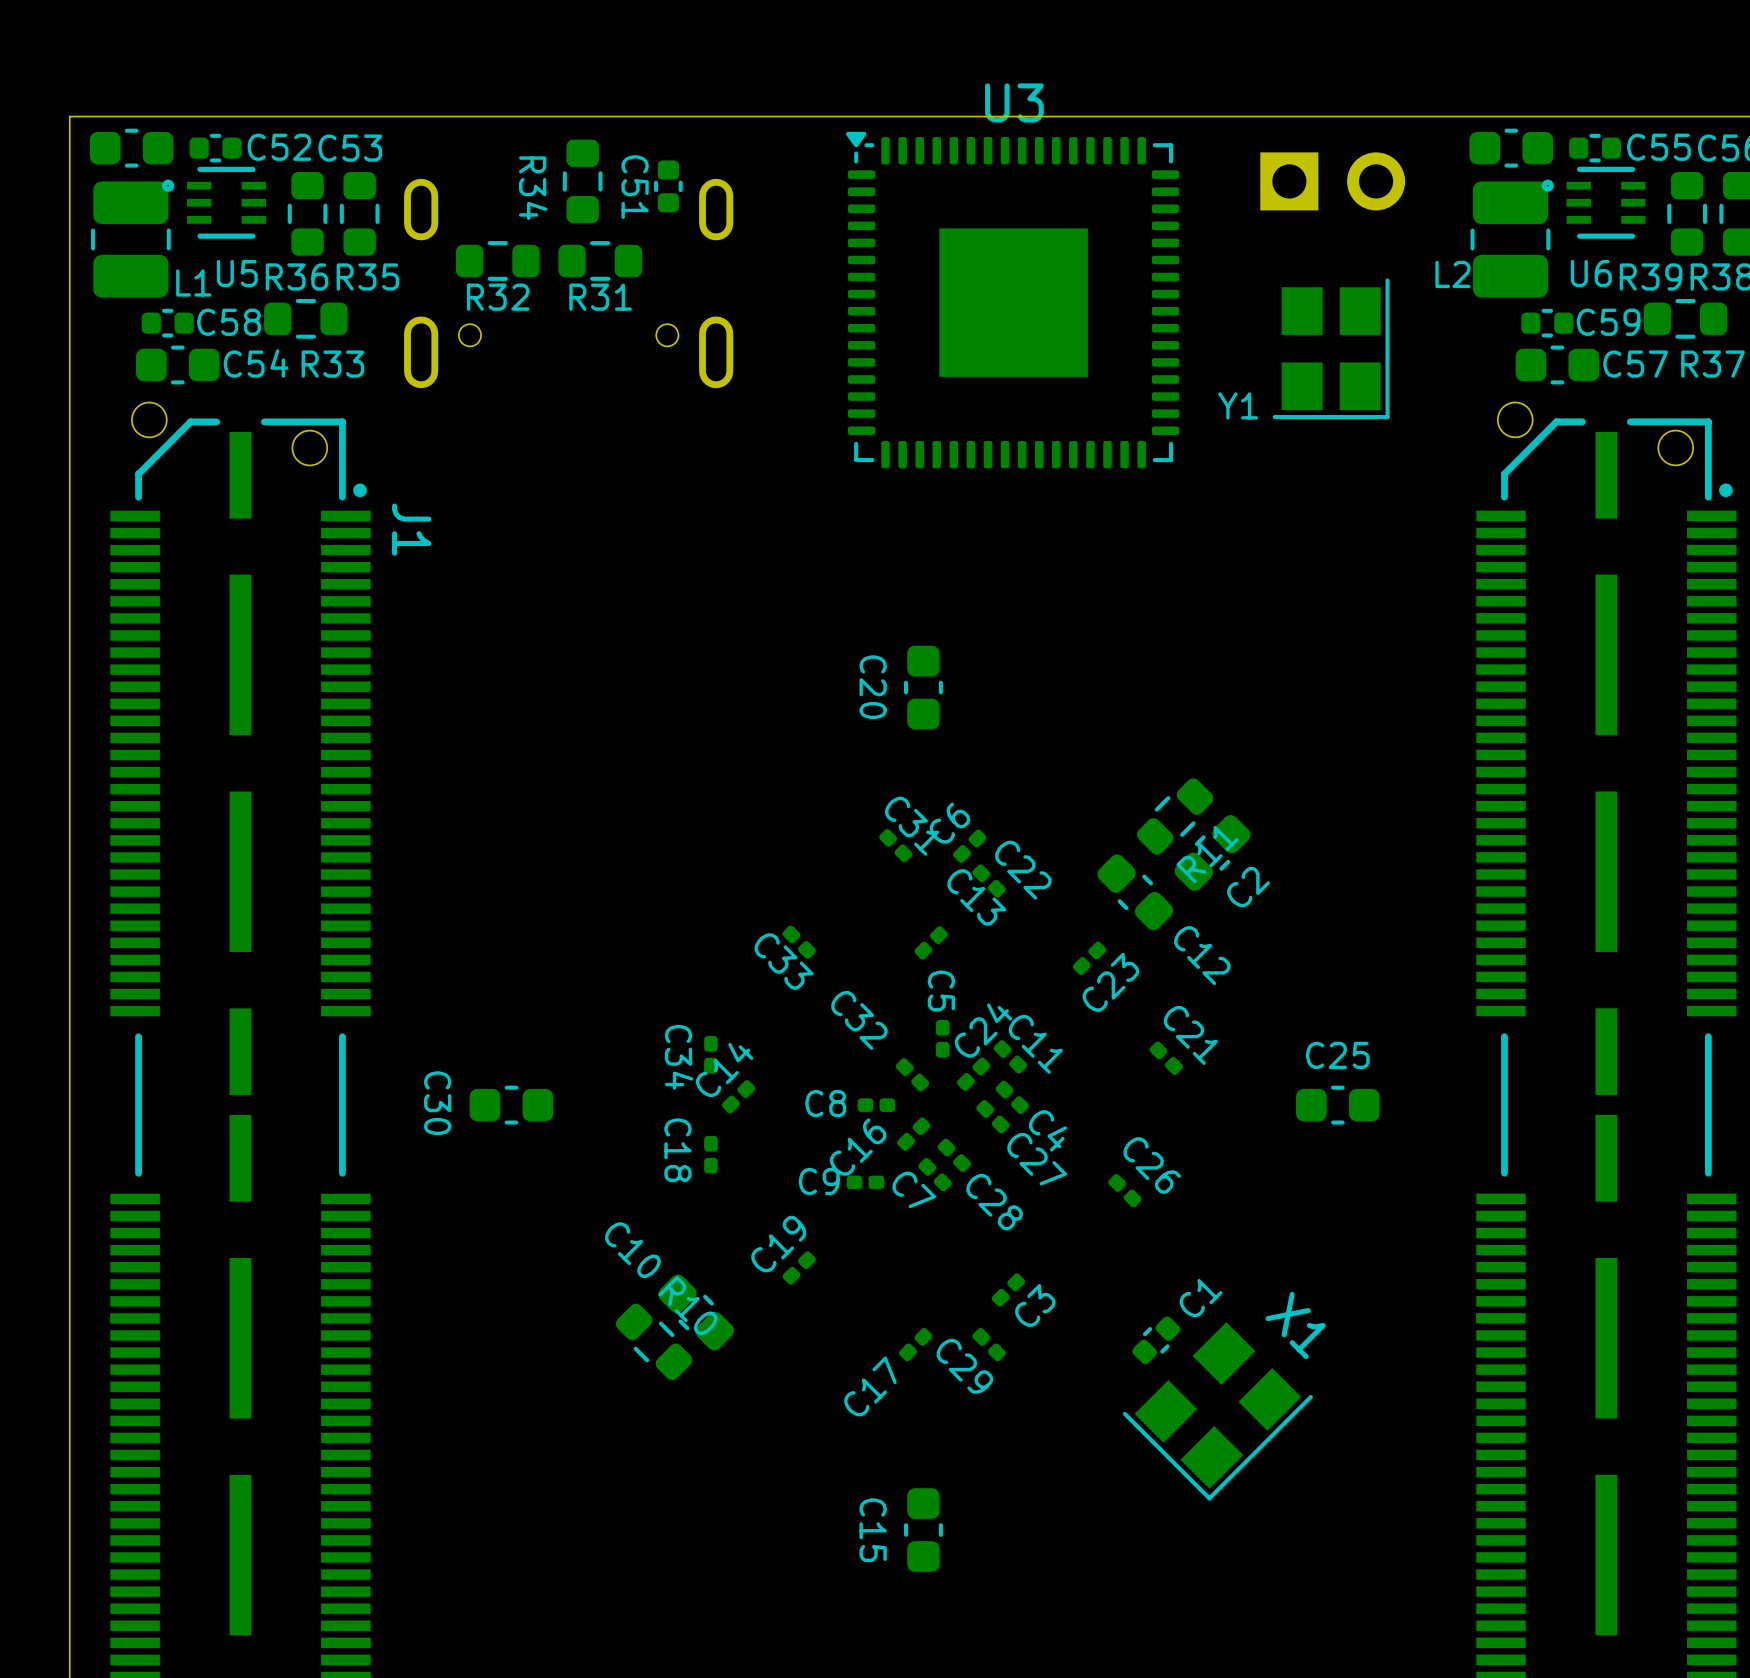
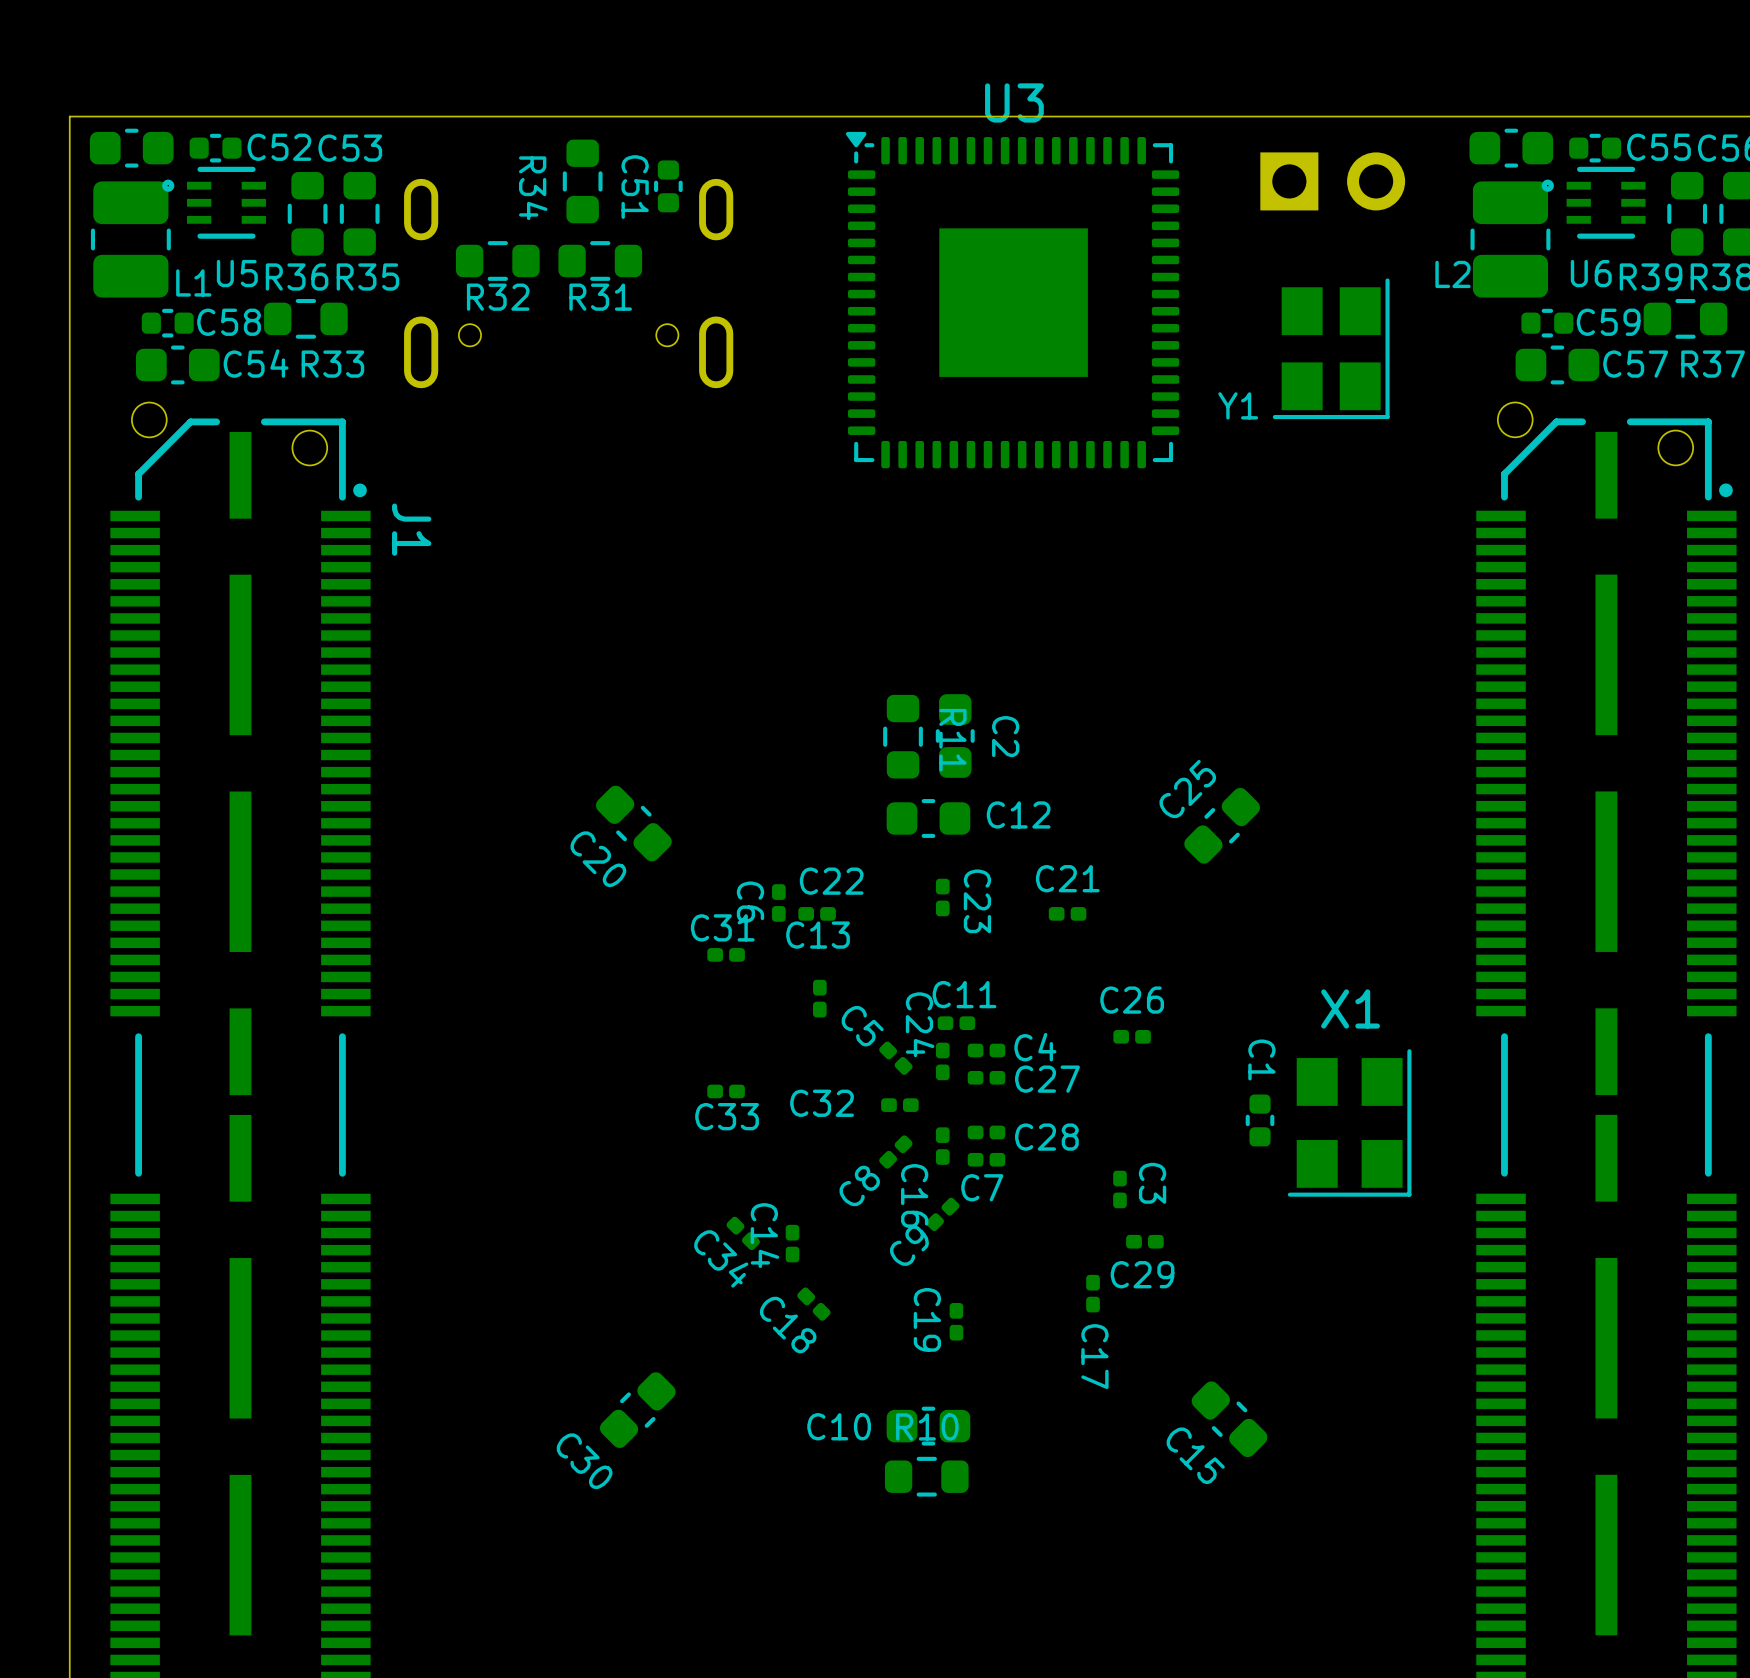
C20 rotation: 0° (923, 687) -> 45° counterclockwise (633, 823)
C20 position: (923, 687) -> (633, 823)
R11 rotation: 0° (1175, 816) -> 45° counterclockwise (903, 736)
R11 position: (1175, 816) -> (903, 736)
C31 rotation: 0° (895, 845) -> 45° counterclockwise (726, 954)
C31 position: (895, 845) -> (726, 954)
C6 rotation: 0° (969, 846) -> 45° counterclockwise (778, 902)
C6 position: (969, 846) -> (778, 902)
C2 rotation: 0° (1212, 852) -> 45° counterclockwise (955, 736)
C2 position: (1212, 852) -> (955, 736)
C22 rotation: 0° (989, 881) -> 45° counterclockwise (817, 913)
C22 position: (989, 881) -> (817, 913)
C12 rotation: 0° (1135, 892) -> 45° counterclockwise (928, 818)
C12 position: (1135, 892) -> (928, 818)
C33 rotation: 0° (799, 942) -> 45° counterclockwise (726, 1091)
C33 position: (799, 942) -> (726, 1091)
C13 rotation: 0° (931, 942) -> 45° counterclockwise (819, 998)
C13 position: (931, 942) -> (819, 998)
C23 rotation: 0° (1089, 958) -> 45° counterclockwise (942, 897)
C23 position: (1089, 958) -> (942, 897)
C5 rotation: 0° (942, 1038) -> 45° counterclockwise (895, 1058)
C5 position: (942, 1038) -> (895, 1058)
C34 rotation: 0° (710, 1054) -> 45° counterclockwise (743, 1233)
C34 position: (710, 1054) -> (743, 1233)
C11 rotation: 0° (1010, 1056) -> 45° counterclockwise (956, 1023)
C11 position: (1010, 1056) -> (956, 1023)
C21 rotation: 0° (1166, 1058) -> 45° counterclockwise (1067, 913)
C21 position: (1166, 1058) -> (1067, 913)
C32 rotation: 0° (912, 1074) -> 45° counterclockwise (899, 1105)
C32 position: (912, 1074) -> (899, 1105)
C24 rotation: 0° (973, 1074) -> 45° counterclockwise (942, 1061)
C24 position: (973, 1074) -> (942, 1061)
C14 rotation: 0° (738, 1096) -> 45° counterclockwise (792, 1243)
C14 position: (738, 1096) -> (792, 1243)
C4 rotation: 0° (1012, 1097) -> 45° counterclockwise (986, 1050)
C4 position: (1012, 1097) -> (986, 1050)
C30 rotation: 0° (511, 1105) -> 45° counterclockwise (637, 1410)
C30 position: (511, 1105) -> (637, 1410)
C8 rotation: 0° (876, 1105) -> 45° counterclockwise (895, 1152)
C8 position: (876, 1105) -> (895, 1152)
C25 rotation: 0° (1337, 1105) -> 45° counterclockwise (1222, 825)
C25 position: (1337, 1105) -> (1222, 825)
C27 rotation: 0° (992, 1116) -> 45° counterclockwise (986, 1077)
C27 position: (992, 1116) -> (986, 1077)
C16 rotation: 0° (913, 1134) -> 45° counterclockwise (942, 1146)
C16 position: (913, 1134) -> (942, 1146)
C18 rotation: 0° (710, 1154) -> 45° counterclockwise (813, 1304)
C18 position: (710, 1154) -> (813, 1304)
C28 rotation: 0° (954, 1155) -> 45° counterclockwise (986, 1132)
C28 position: (954, 1155) -> (986, 1132)
C7 rotation: 0° (935, 1174) -> 45° counterclockwise (986, 1159)
C7 position: (935, 1174) -> (986, 1159)
C9 rotation: 0° (865, 1182) -> 45° counterclockwise (942, 1214)
C9 position: (865, 1182) -> (942, 1214)
C26 rotation: 0° (1124, 1190) -> 45° counterclockwise (1132, 1036)
C26 position: (1124, 1190) -> (1132, 1036)
C19 rotation: 0° (799, 1267) -> 45° counterclockwise (956, 1321)
C19 position: (799, 1267) -> (956, 1321)
C3 rotation: 0° (1008, 1290) -> 45° counterclockwise (1119, 1189)
C3 position: (1008, 1290) -> (1119, 1189)
C10 rotation: 0° (696, 1312) -> 45° counterclockwise (928, 1426)
C10 position: (696, 1312) -> (928, 1426)
C1 rotation: 0° (1156, 1340) -> 45° counterclockwise (1260, 1120)
C1 position: (1156, 1340) -> (1260, 1120)
R10 rotation: 0° (654, 1341) -> 45° counterclockwise (926, 1476)
R10 position: (654, 1341) -> (926, 1476)
C17 rotation: 0° (915, 1344) -> 45° counterclockwise (1093, 1293)
C17 position: (915, 1344) -> (1093, 1293)
C29 rotation: 0° (989, 1344) -> 45° counterclockwise (1144, 1241)
C29 position: (989, 1344) -> (1144, 1241)
X1 rotation: 0° (1217, 1411) -> 45° counterclockwise (1349, 1122)
X1 position: (1217, 1411) -> (1349, 1122)
C15 rotation: 0° (923, 1530) -> 45° counterclockwise (1229, 1419)
C15 position: (923, 1530) -> (1229, 1419)

